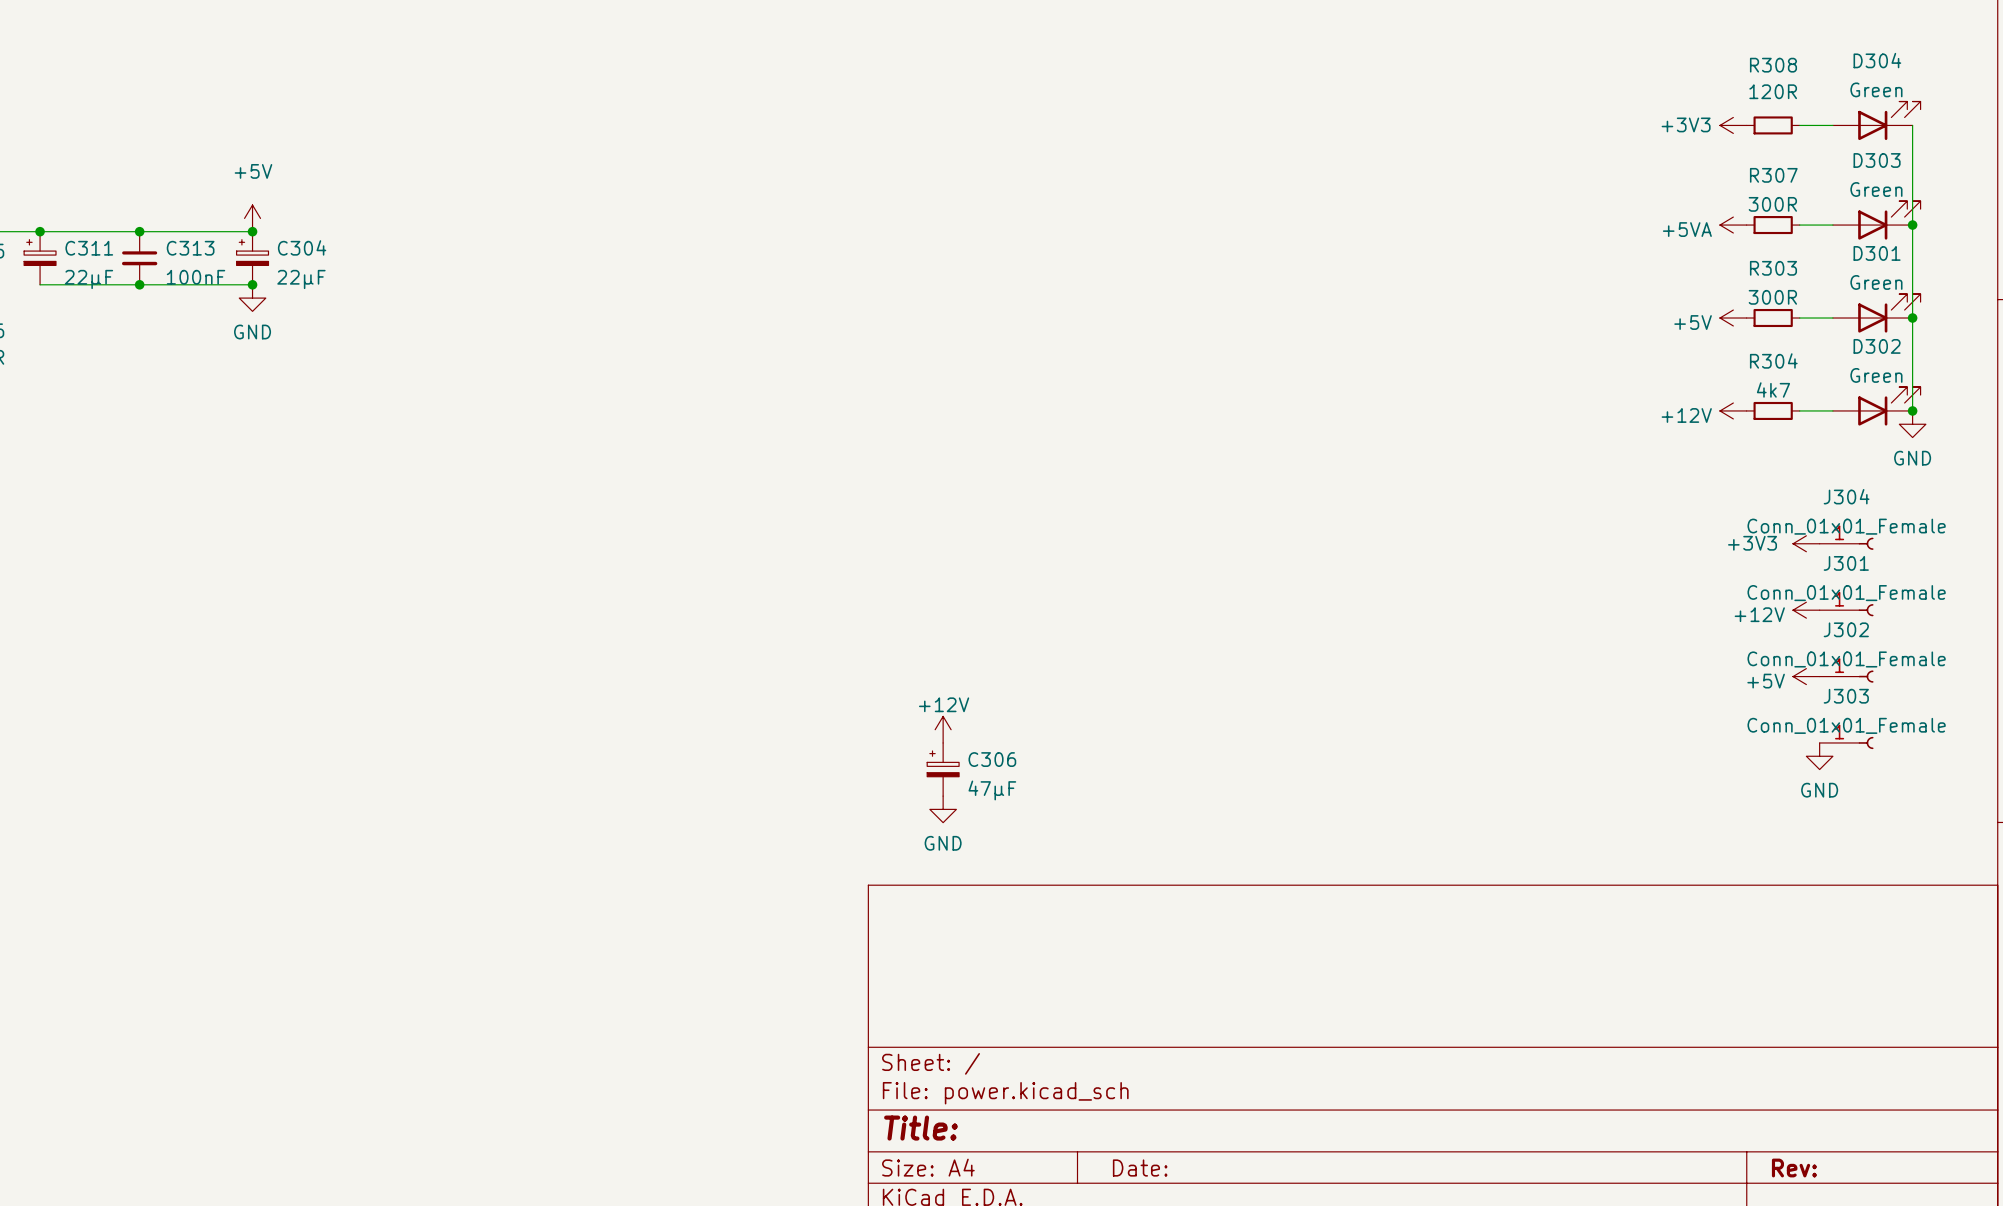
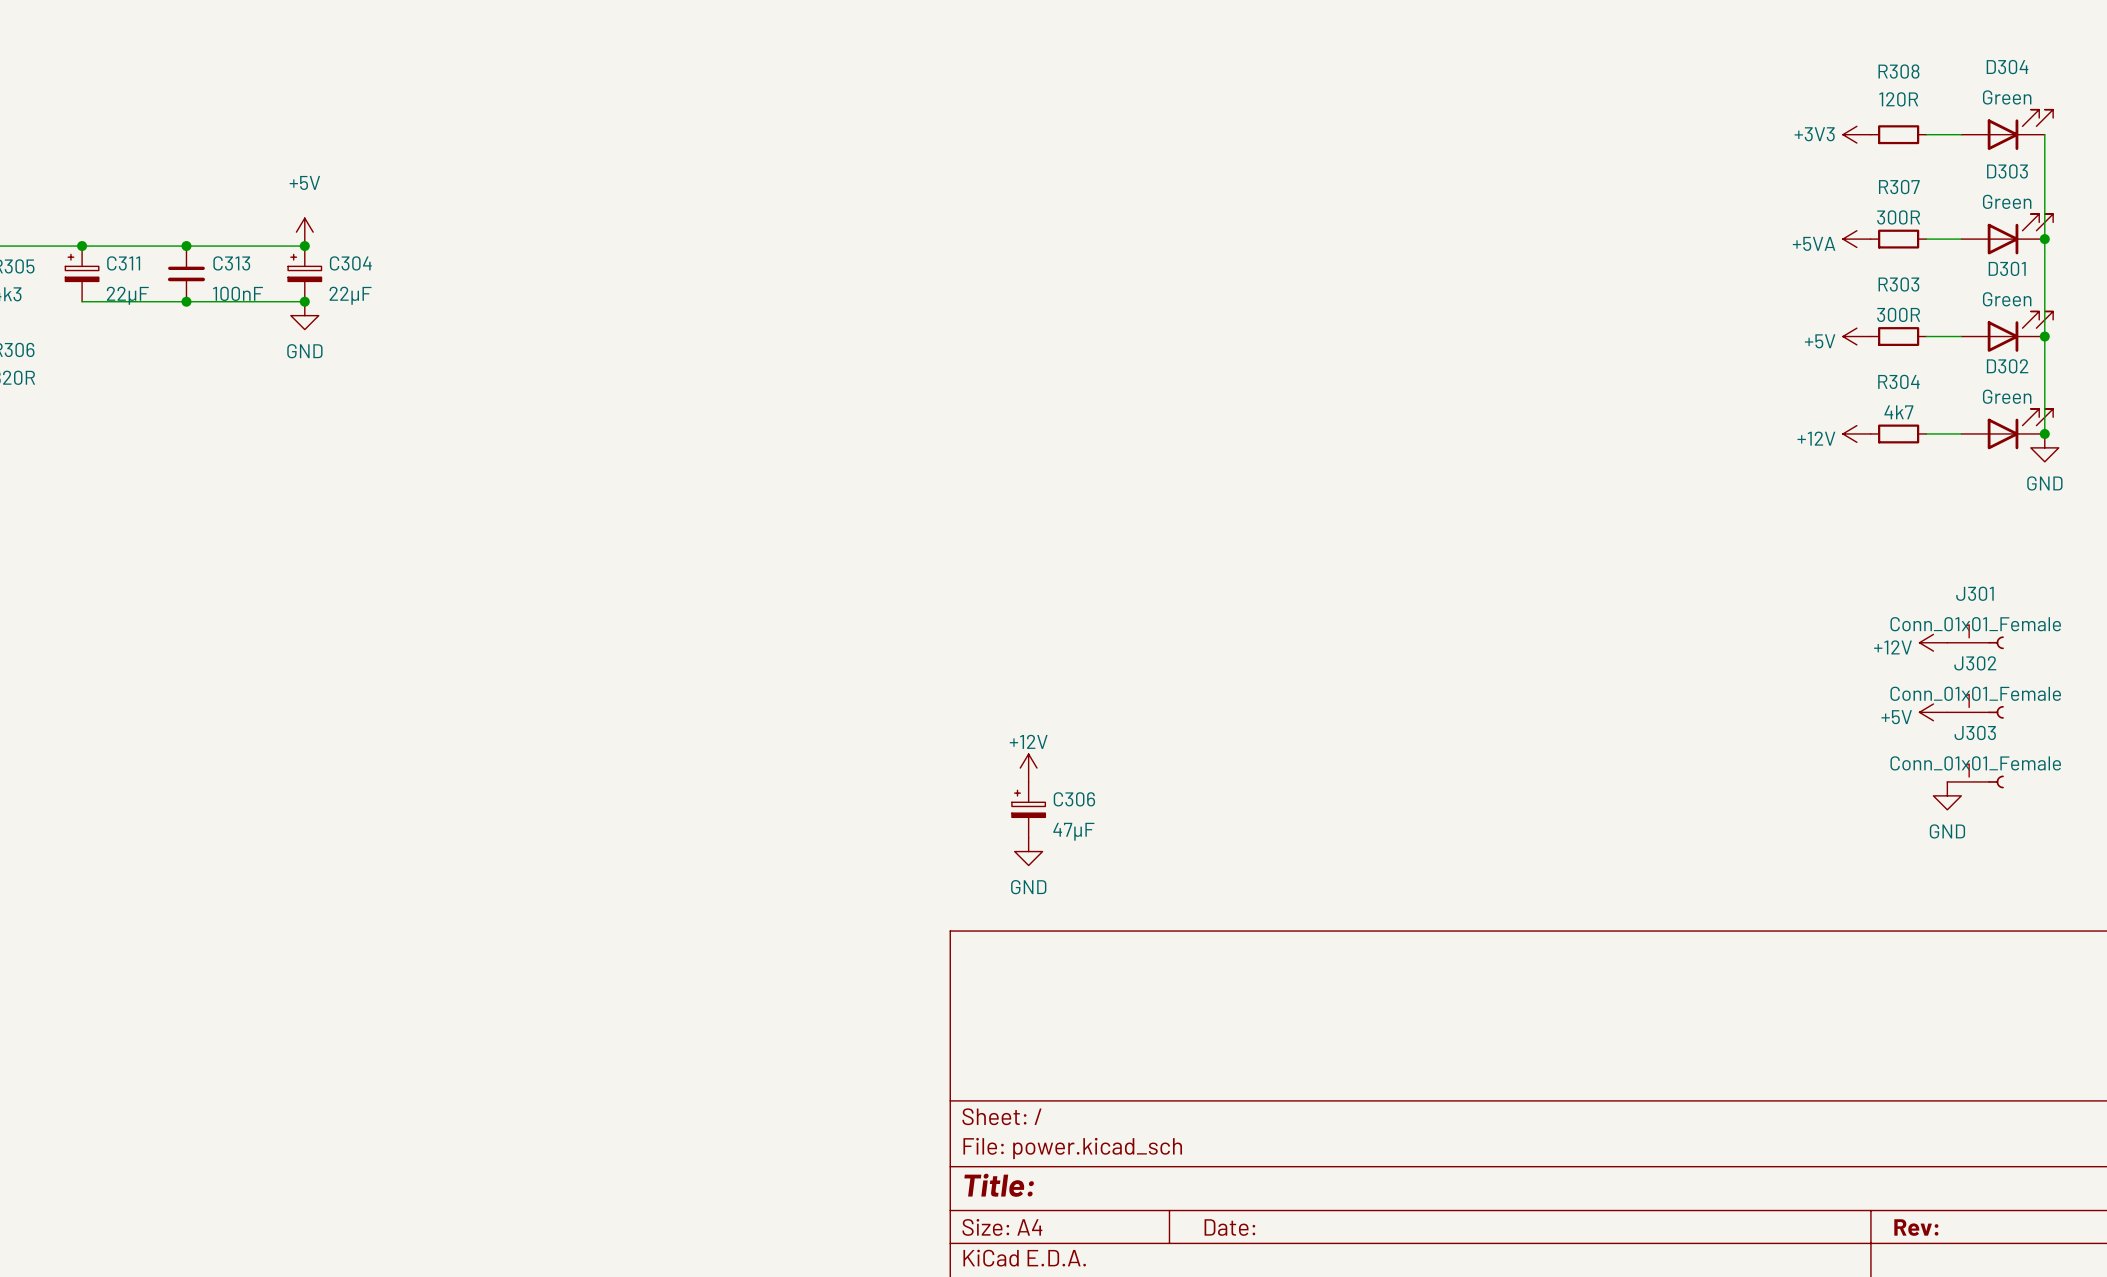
power symbol: +3V3 (1806, 543) -> none
J304: Conn_01x01_Female (1846, 543) -> none

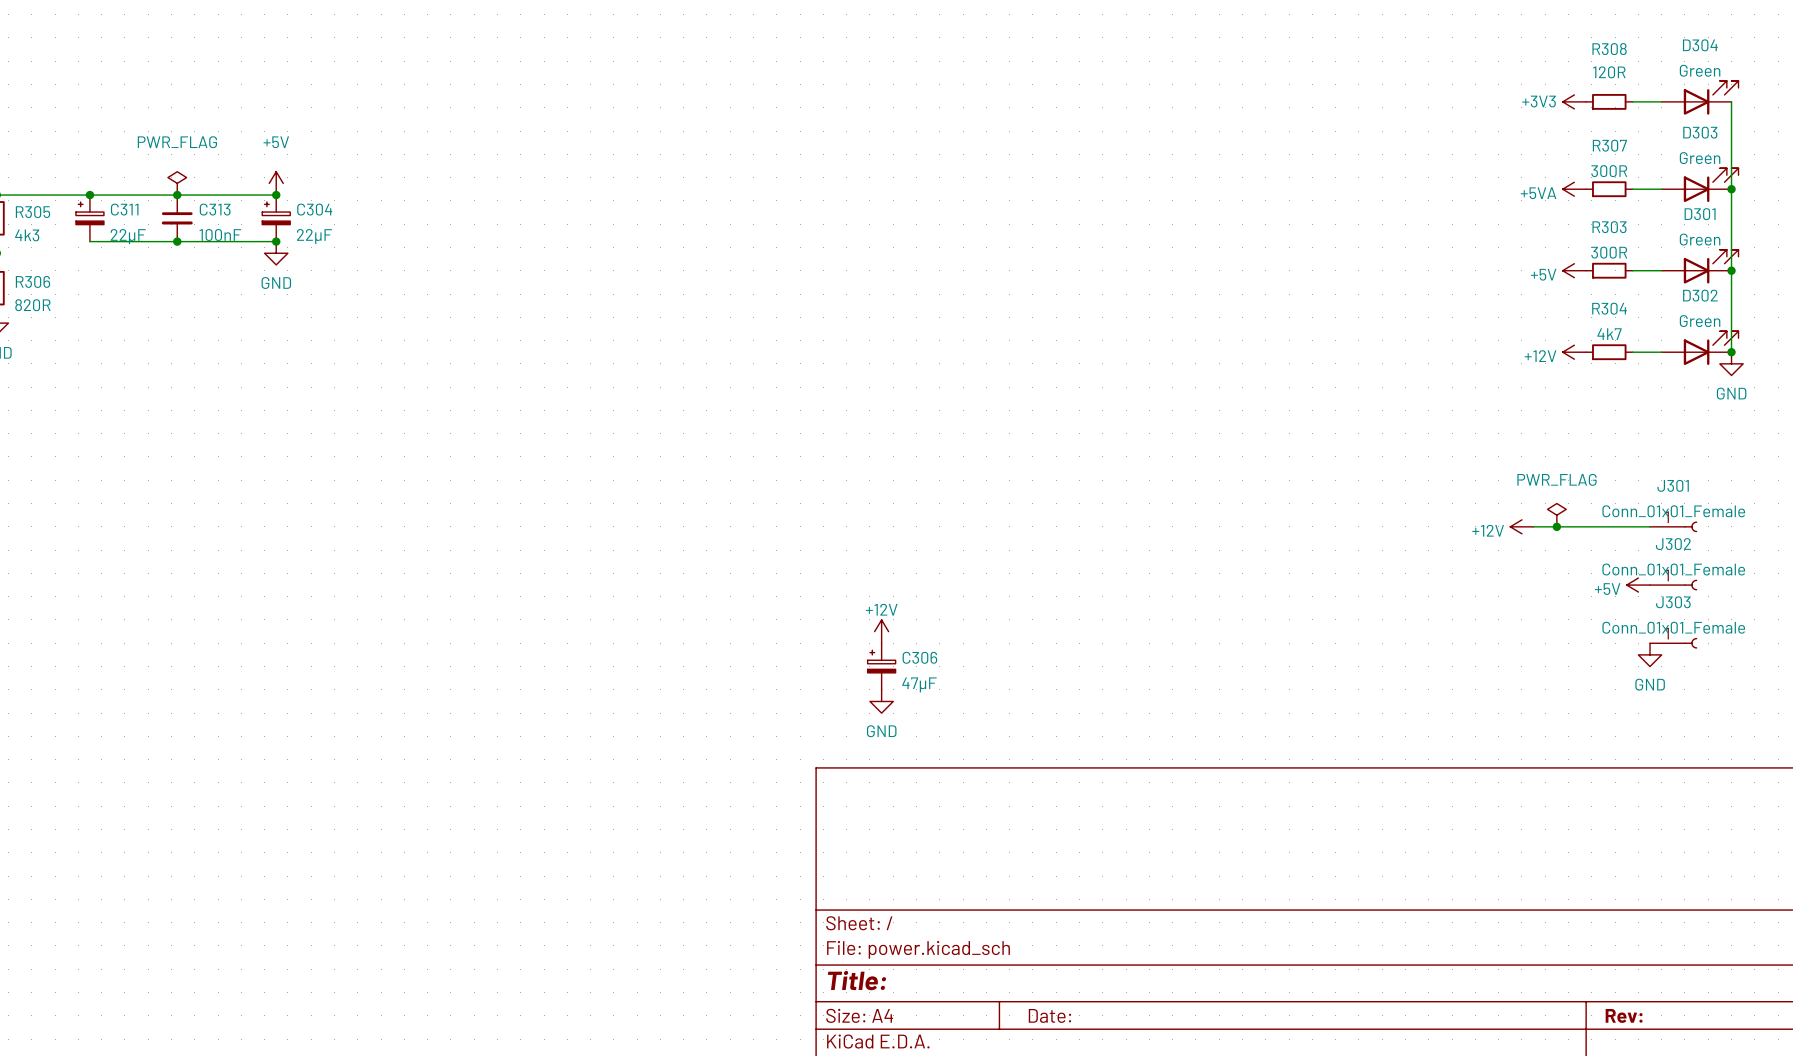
power symbol: none -> PWR_FLAG (177, 183)
power symbol: none -> PWR_FLAG (1556, 515)
wire: none -> (1533, 526) (1650, 526)
junction: none -> (1556, 526)
power symbol position: +12V (1933, 642) -> +12V (1521, 526)

